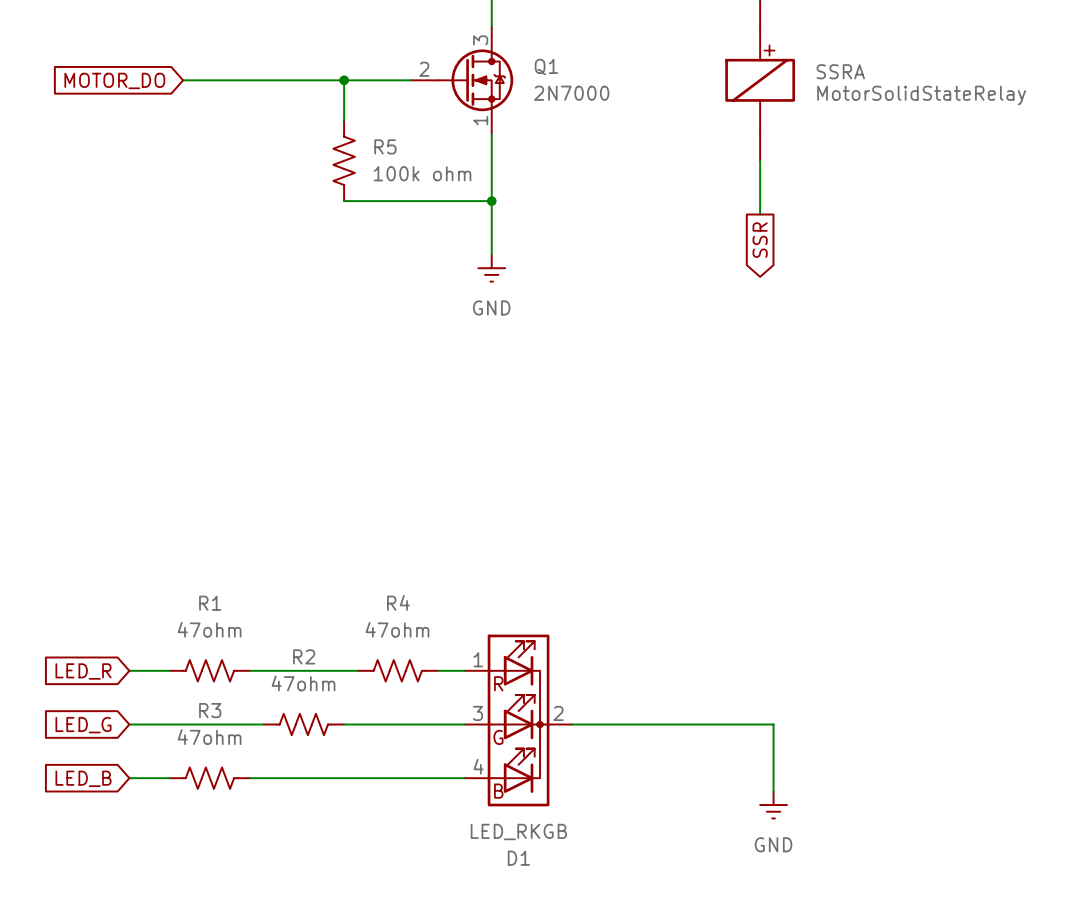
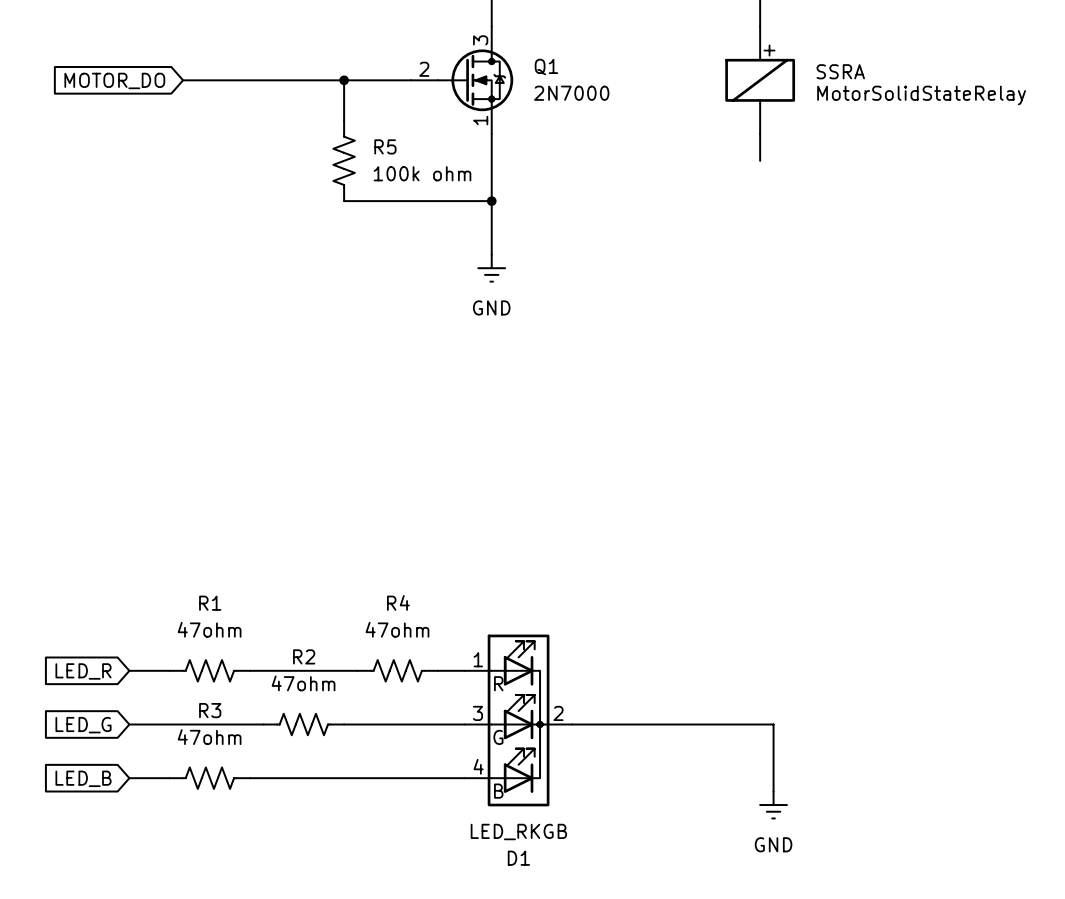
wire: (760, 160) (760, 214) -> none
global label: SSR (760, 240) -> none

